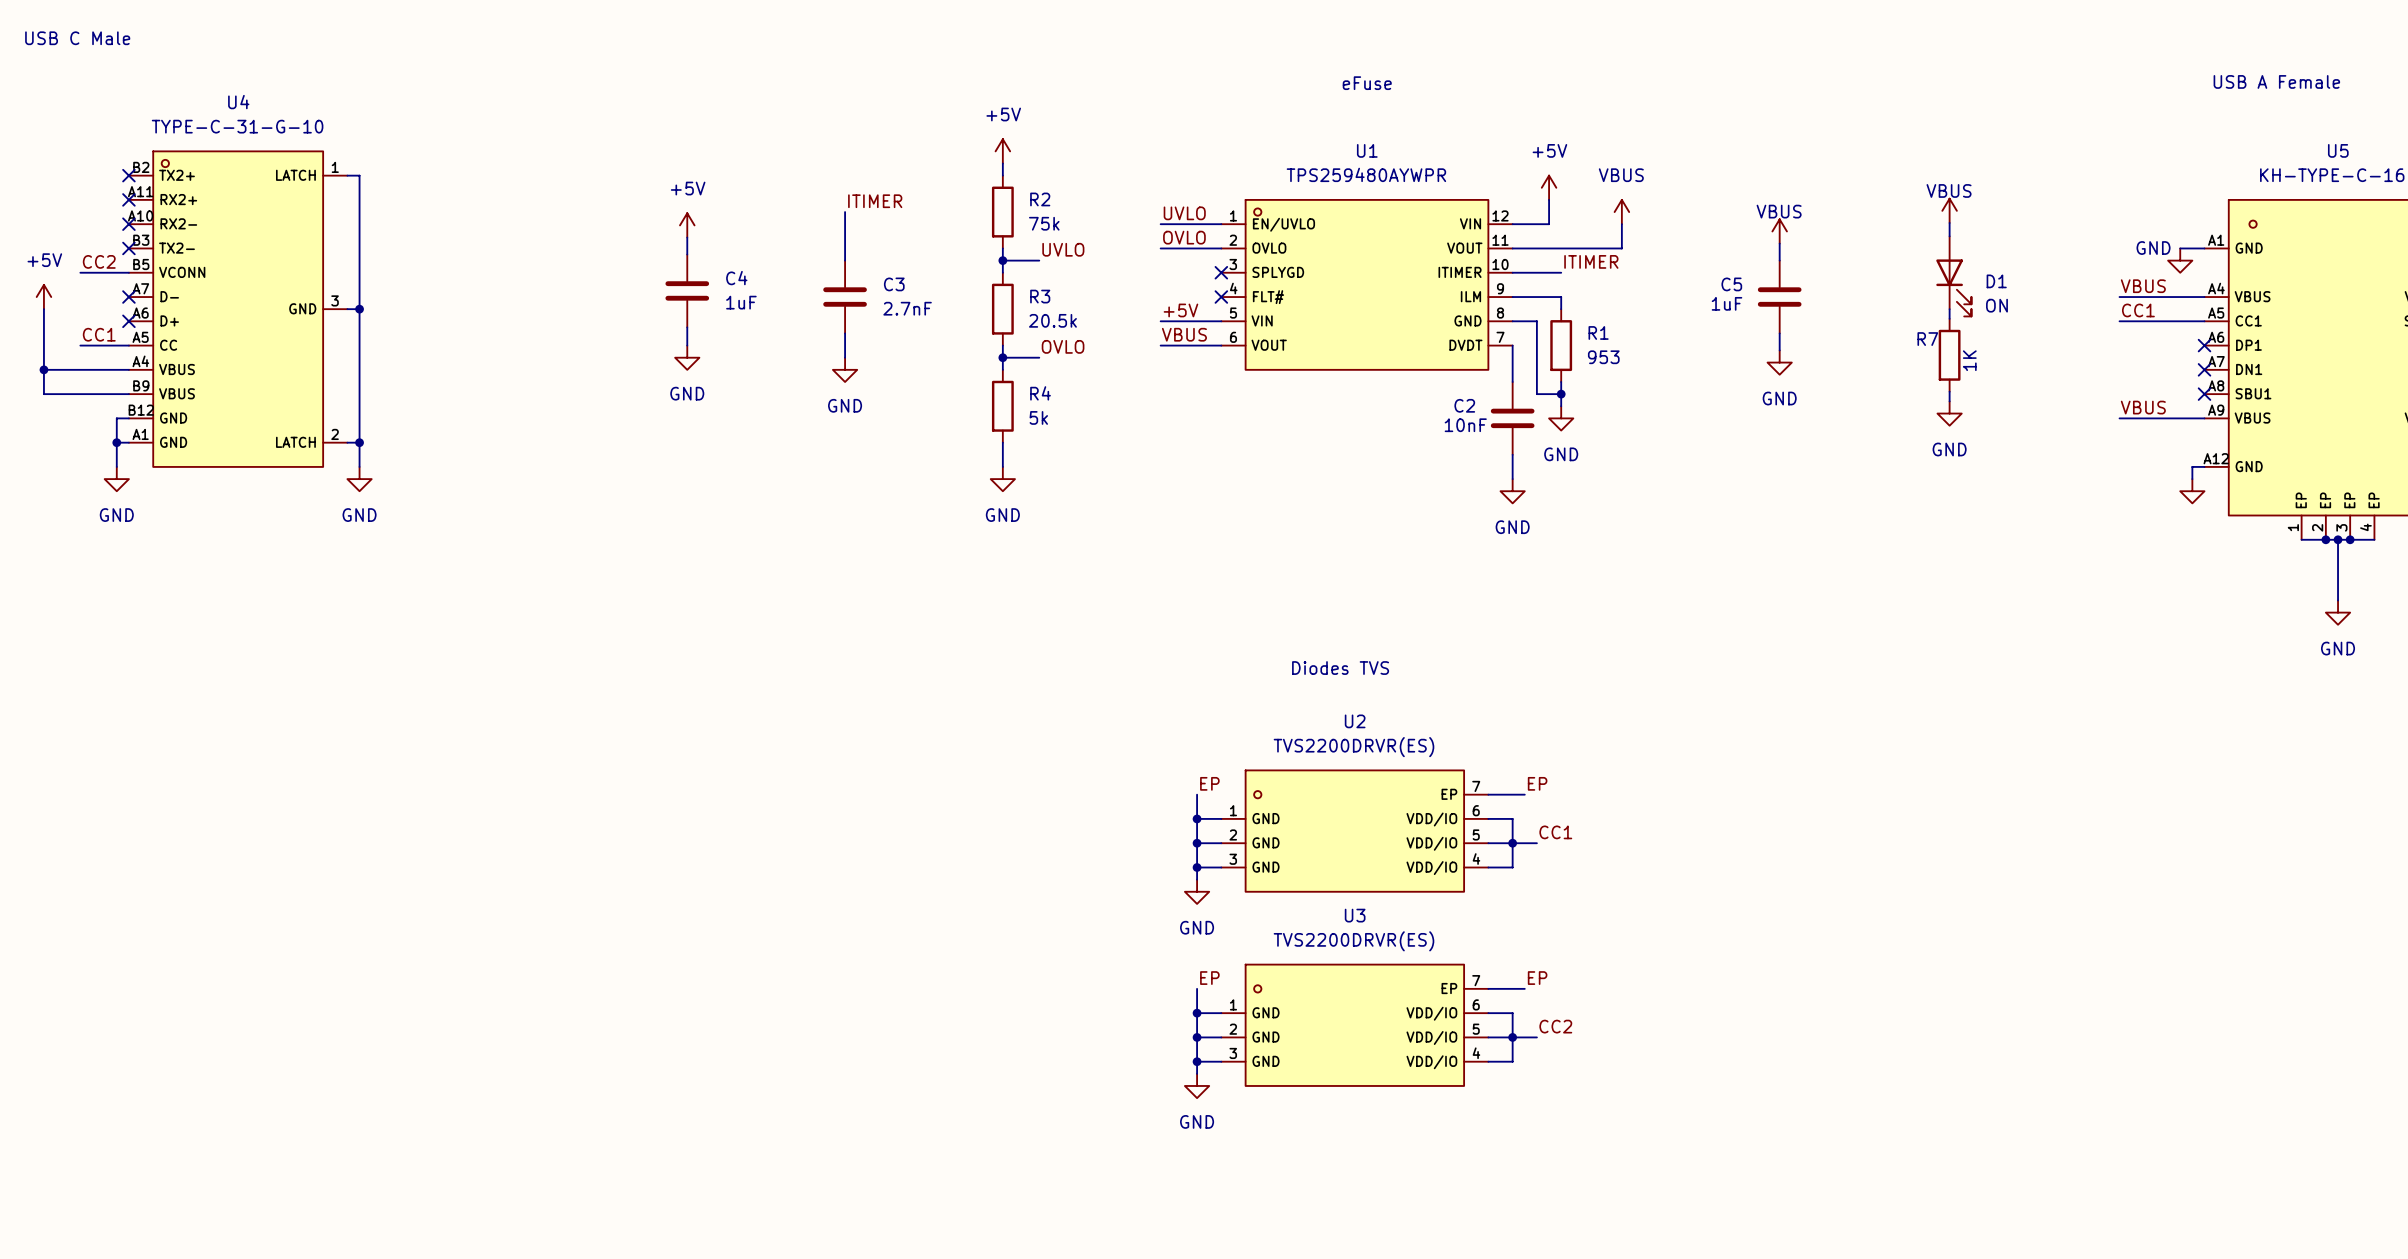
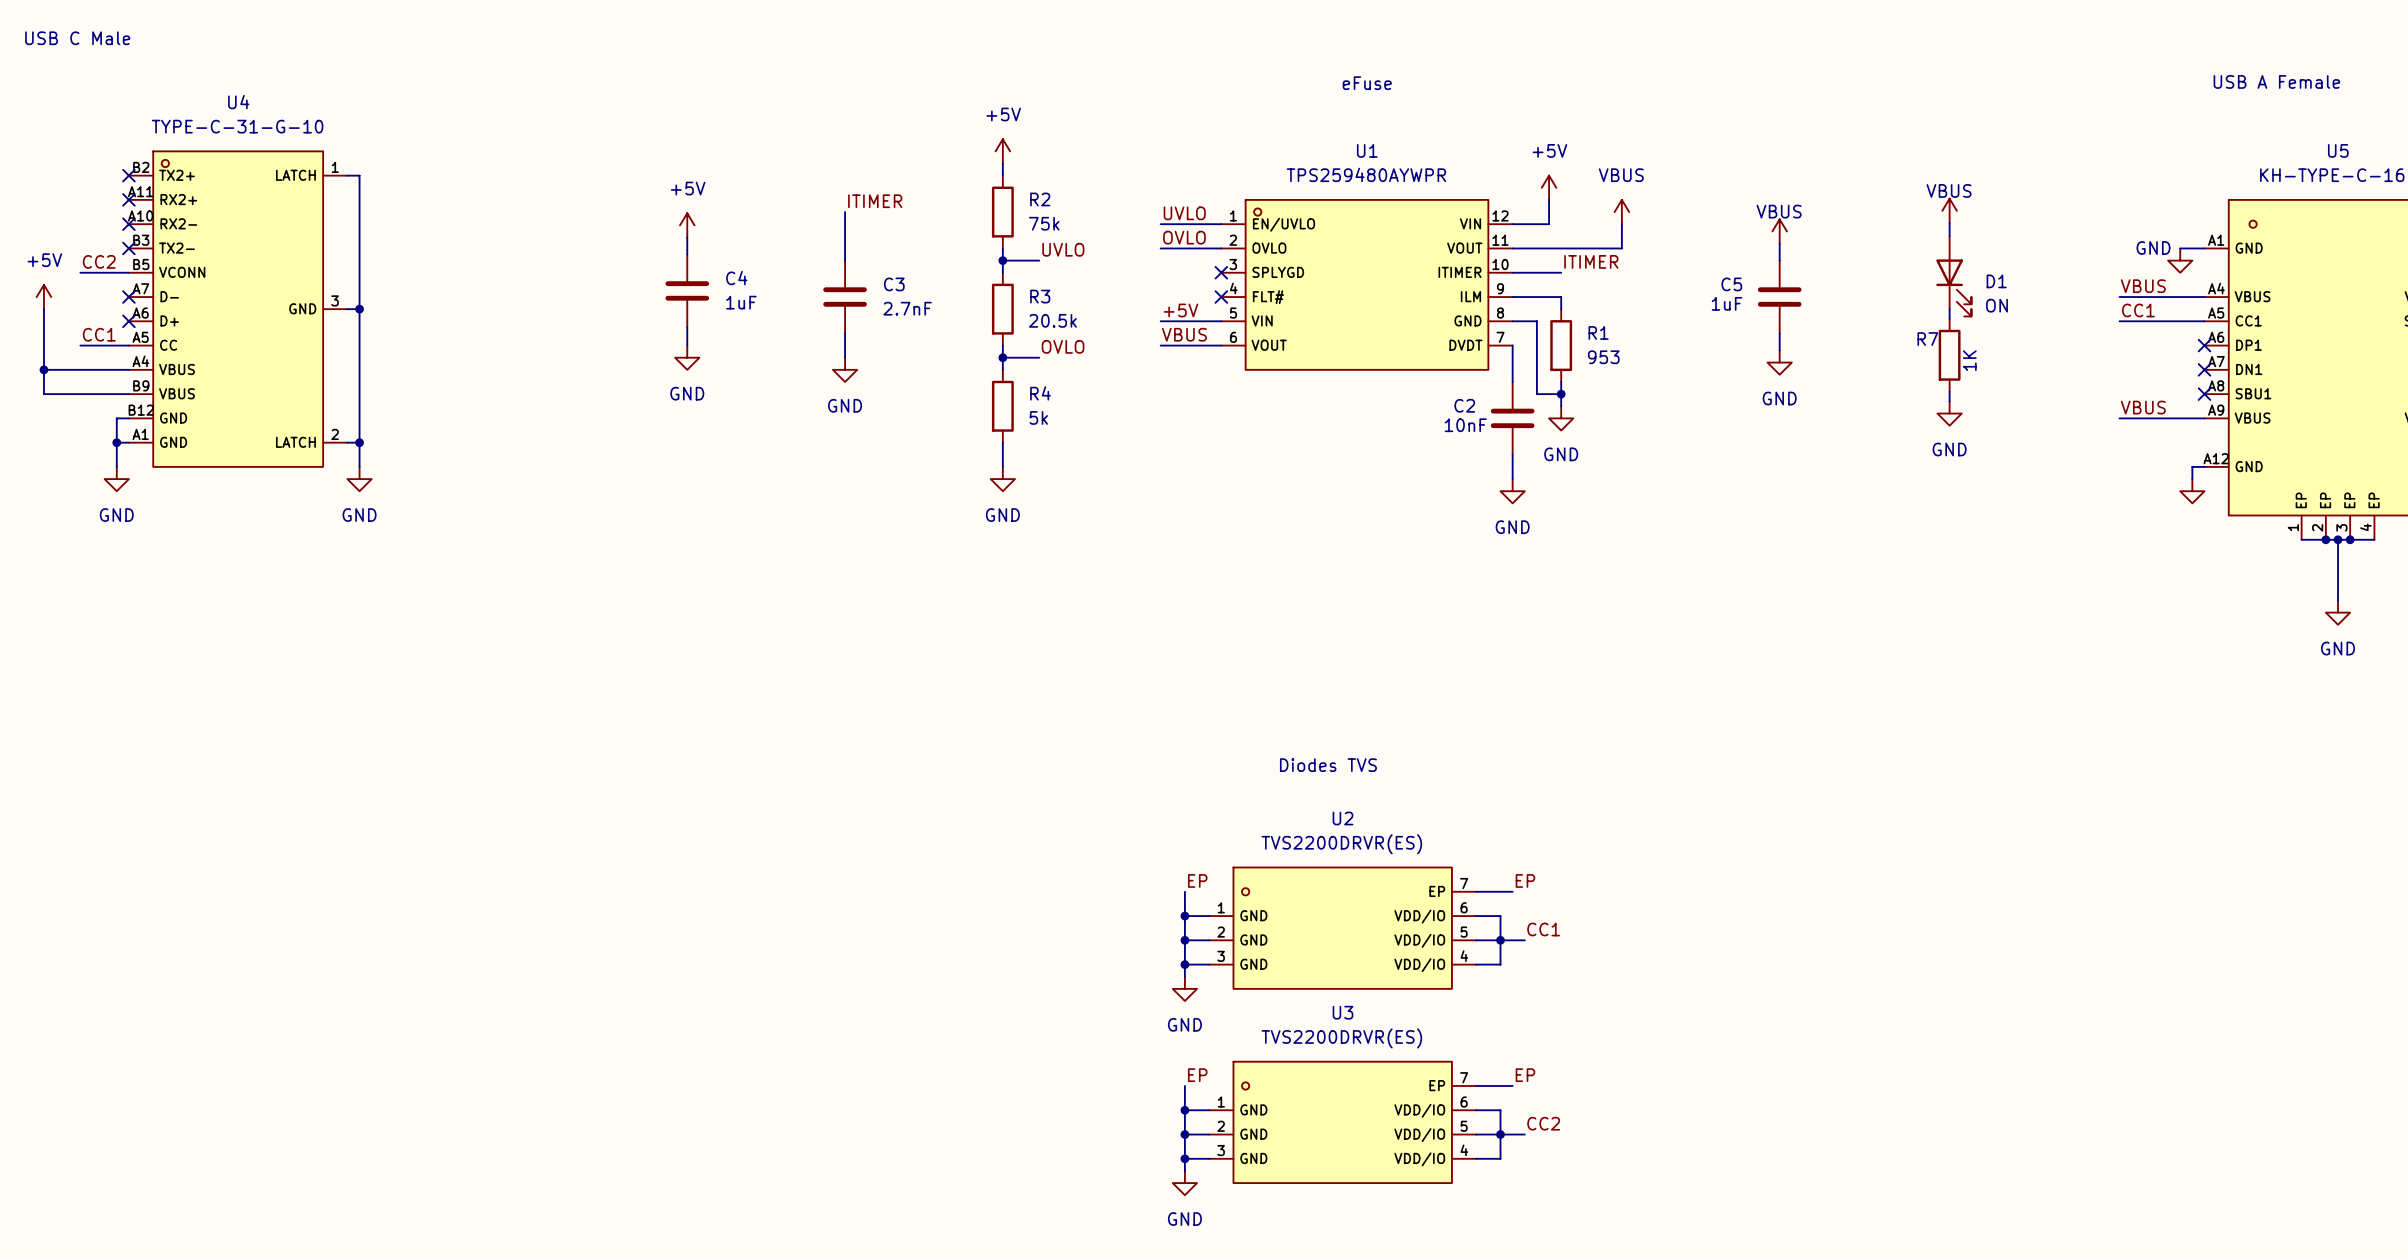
text position: Diodes TVS (1340, 668) -> Diodes TVS (1328, 765)
label: EP (1209, 783) -> none
label: EP (1537, 783) -> none
wire: (1197, 794) (1197, 879) -> (1184, 891) (1184, 976)
wire: (1488, 794) (1524, 794) -> (1476, 891) (1512, 891)
wire: (1197, 818) (1221, 818) -> (1184, 916) (1209, 916)
junction: (1197, 818) -> none
wire: (1488, 818) (1512, 818) (1512, 867) (1488, 867) -> (1476, 916) (1500, 916) (1500, 964) (1476, 964)
U2 position: (1354, 831) -> (1342, 928)
label position: CC1 (1555, 832) -> CC1 (1543, 929)
wire: (1197, 843) (1221, 843) -> (1184, 940) (1209, 940)
junction: (1197, 843) -> none
wire: (1488, 843) (1536, 843) -> (1476, 940) (1524, 940)
junction: (1512, 843) -> none
wire: (1197, 867) (1221, 867) -> (1184, 964) (1209, 964)
junction: (1197, 867) -> none
label: none -> EP (1197, 880)
label: none -> EP (1525, 880)
power symbol: GND (1197, 891) -> none
junction: none -> (1184, 916)
junction: none -> (1184, 940)
junction: none -> (1500, 940)
junction: none -> (1184, 964)
label: EP (1209, 978) -> none
label: EP (1537, 978) -> none
power symbol: none -> GND (1184, 988)
wire: (1197, 988) (1197, 1073) -> (1184, 1085) (1184, 1170)
wire: (1488, 988) (1524, 988) -> (1476, 1085) (1512, 1085)
wire: (1197, 1013) (1221, 1013) -> (1184, 1110) (1209, 1110)
junction: (1197, 1013) -> none
wire: (1488, 1013) (1512, 1013) (1512, 1061) (1488, 1061) -> (1476, 1110) (1500, 1110) (1500, 1158) (1476, 1158)
U3 position: (1354, 1025) -> (1342, 1122)
label position: CC2 (1555, 1026) -> CC2 (1543, 1123)
wire: (1197, 1037) (1221, 1037) -> (1184, 1134) (1209, 1134)
junction: (1197, 1037) -> none
wire: (1488, 1037) (1536, 1037) -> (1476, 1134) (1524, 1134)
junction: (1512, 1037) -> none
wire: (1197, 1061) (1221, 1061) -> (1184, 1158) (1209, 1158)
junction: (1197, 1061) -> none
label: none -> EP (1197, 1075)
label: none -> EP (1525, 1075)
power symbol: GND (1197, 1085) -> none
junction: none -> (1184, 1110)
junction: none -> (1184, 1134)
junction: none -> (1500, 1134)
junction: none -> (1184, 1158)
power symbol: none -> GND (1184, 1183)

